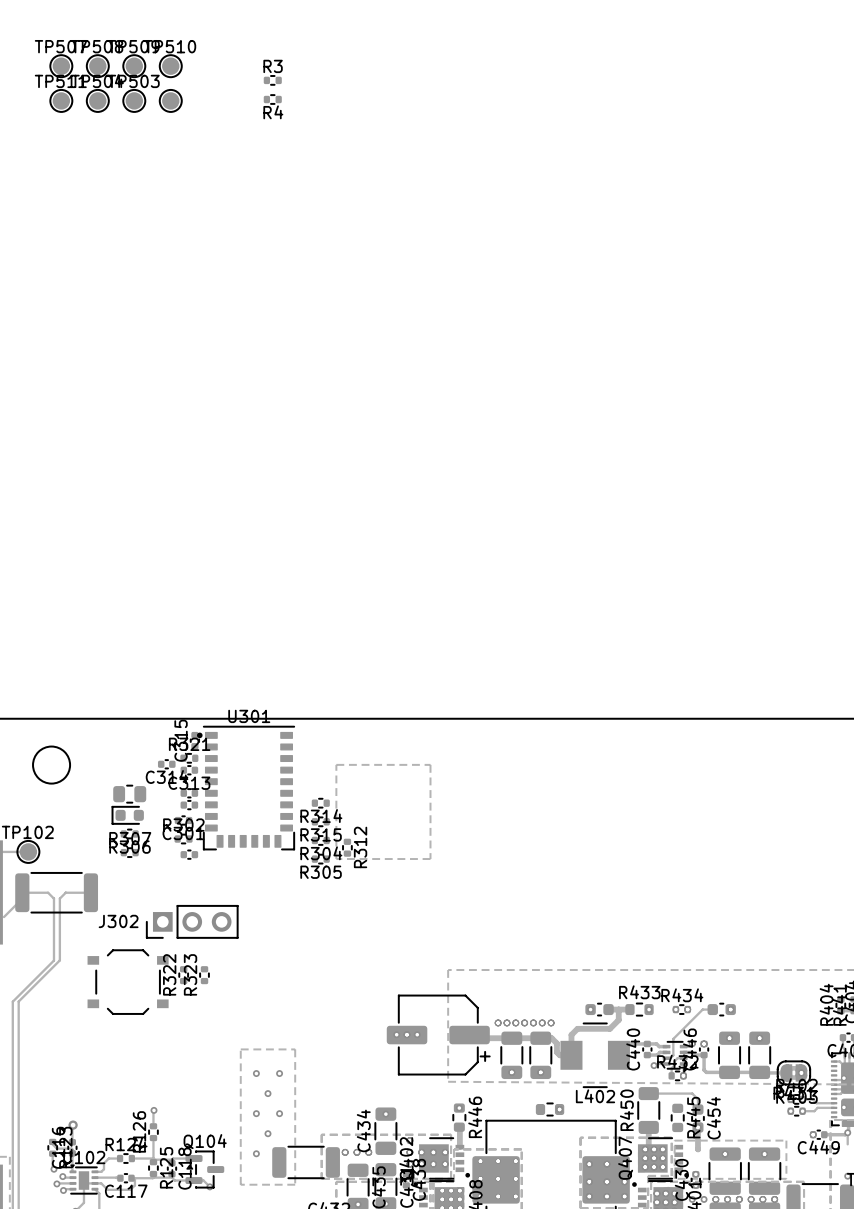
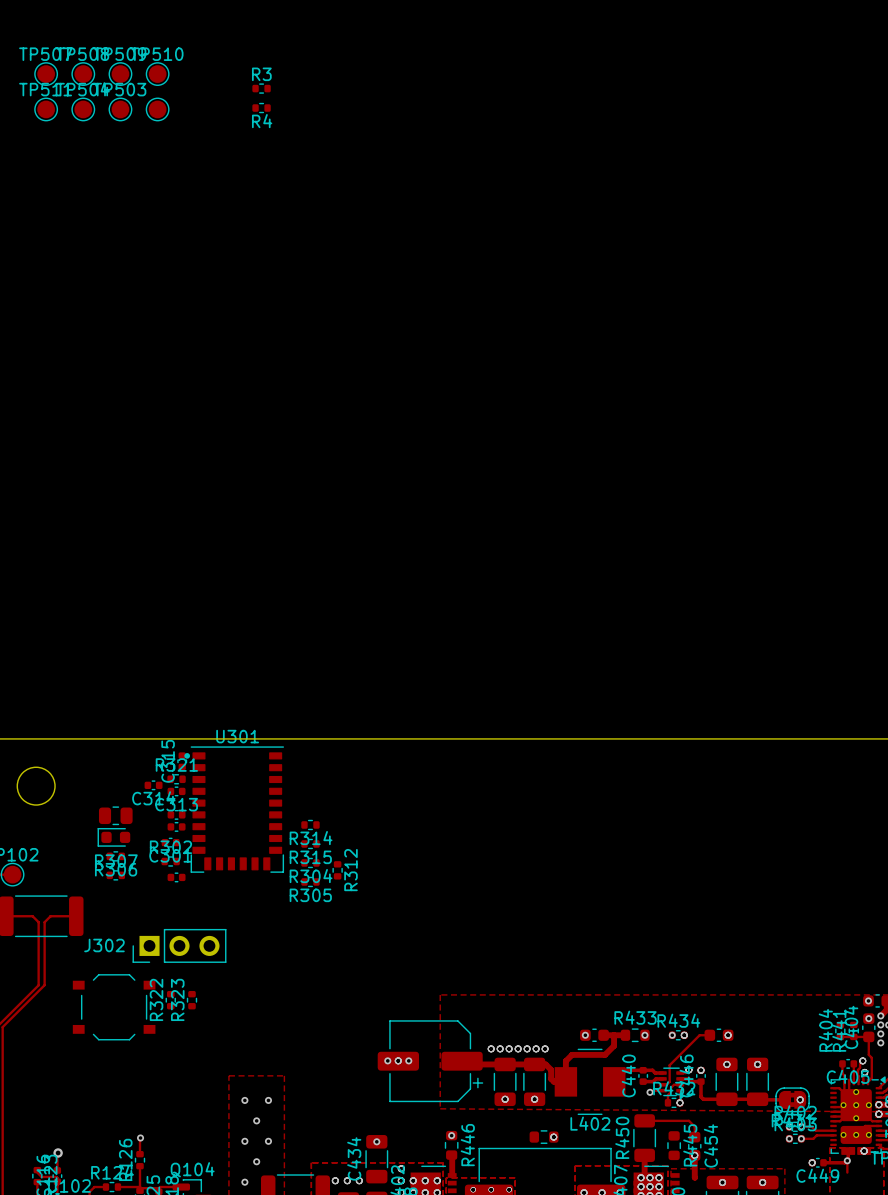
zone outline: (336, 764) (336, 859) (430, 859) (430, 764) (336, 764) -> none

